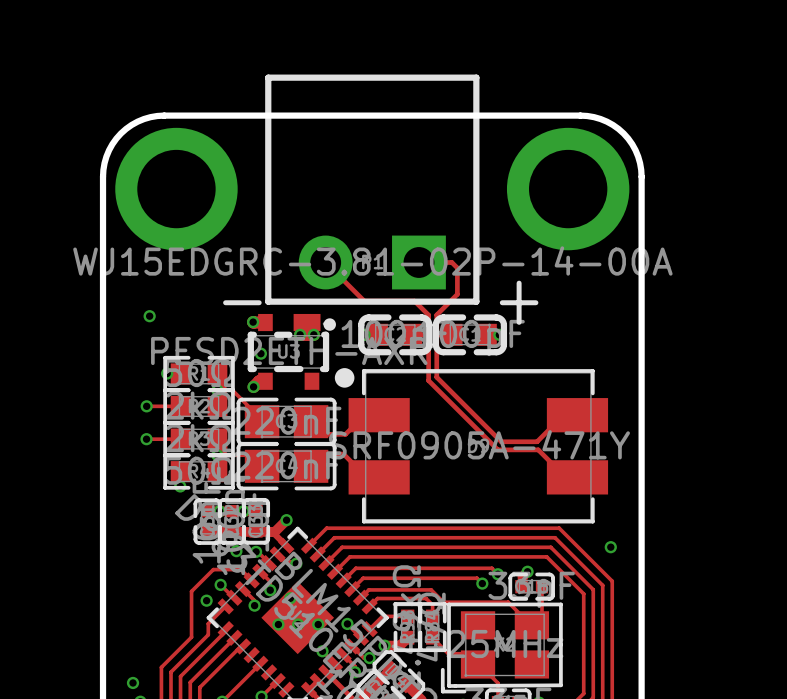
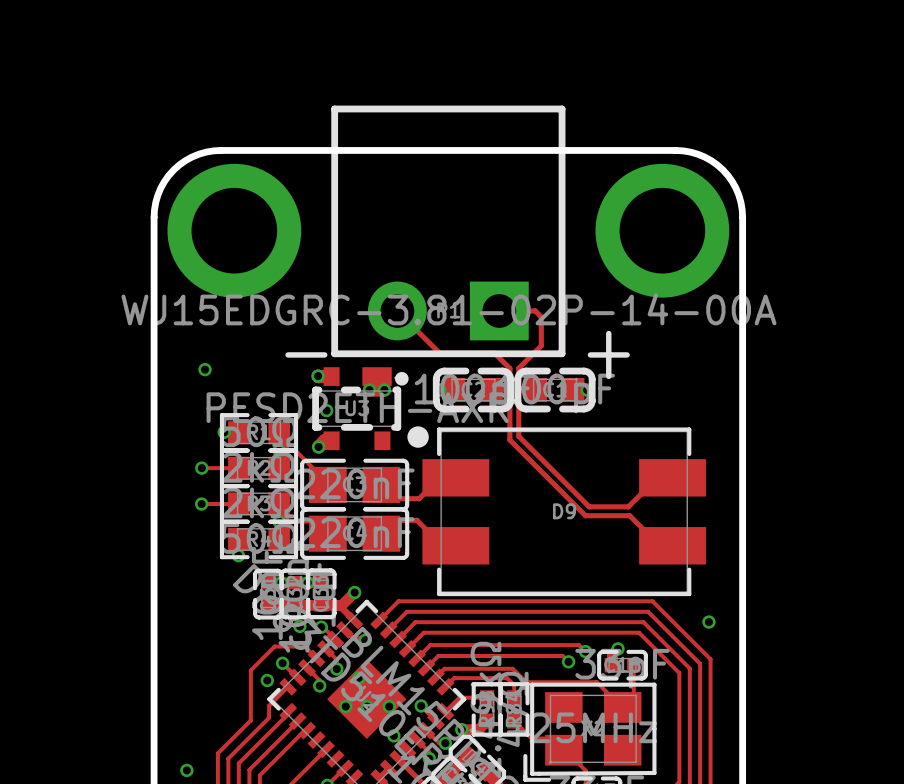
D9 value: SRF0905A-471Y (479, 444) -> none

